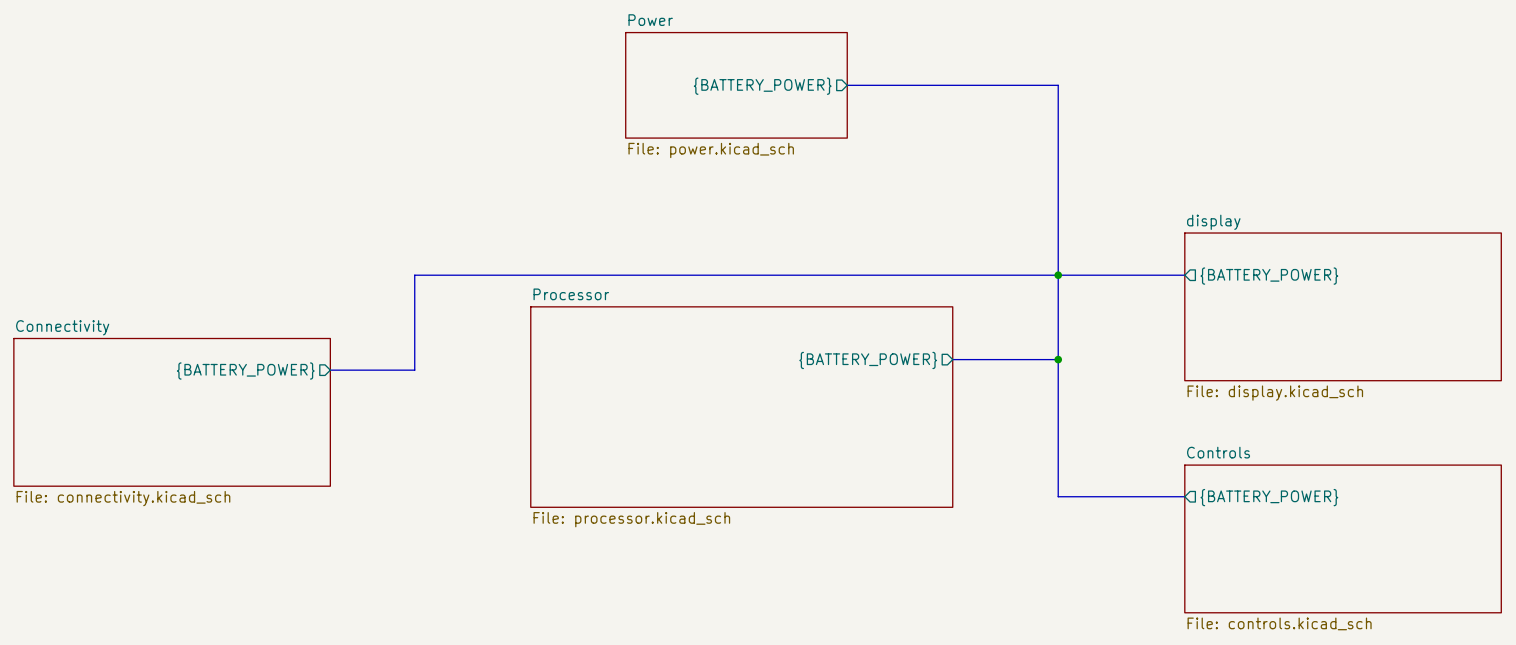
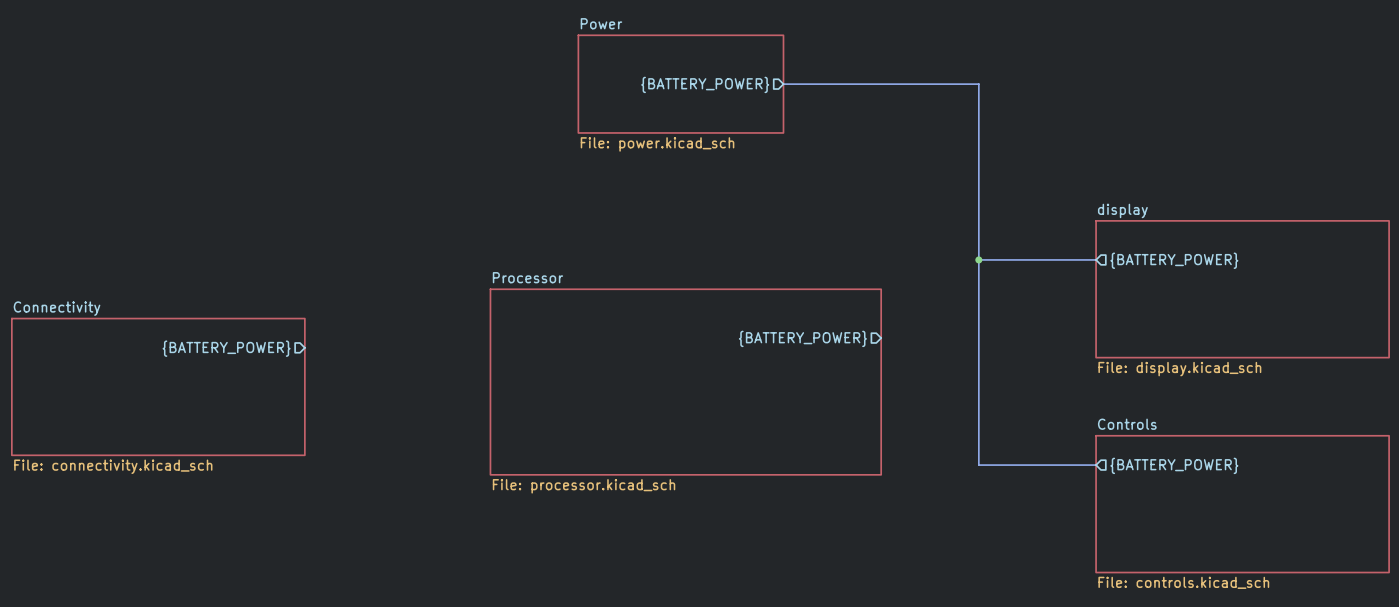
bus: (1058, 275) (414, 275) (414, 370) (330, 370) -> none
bus: (952, 359) (1058, 359) -> none
junction: (1058, 359) -> none

